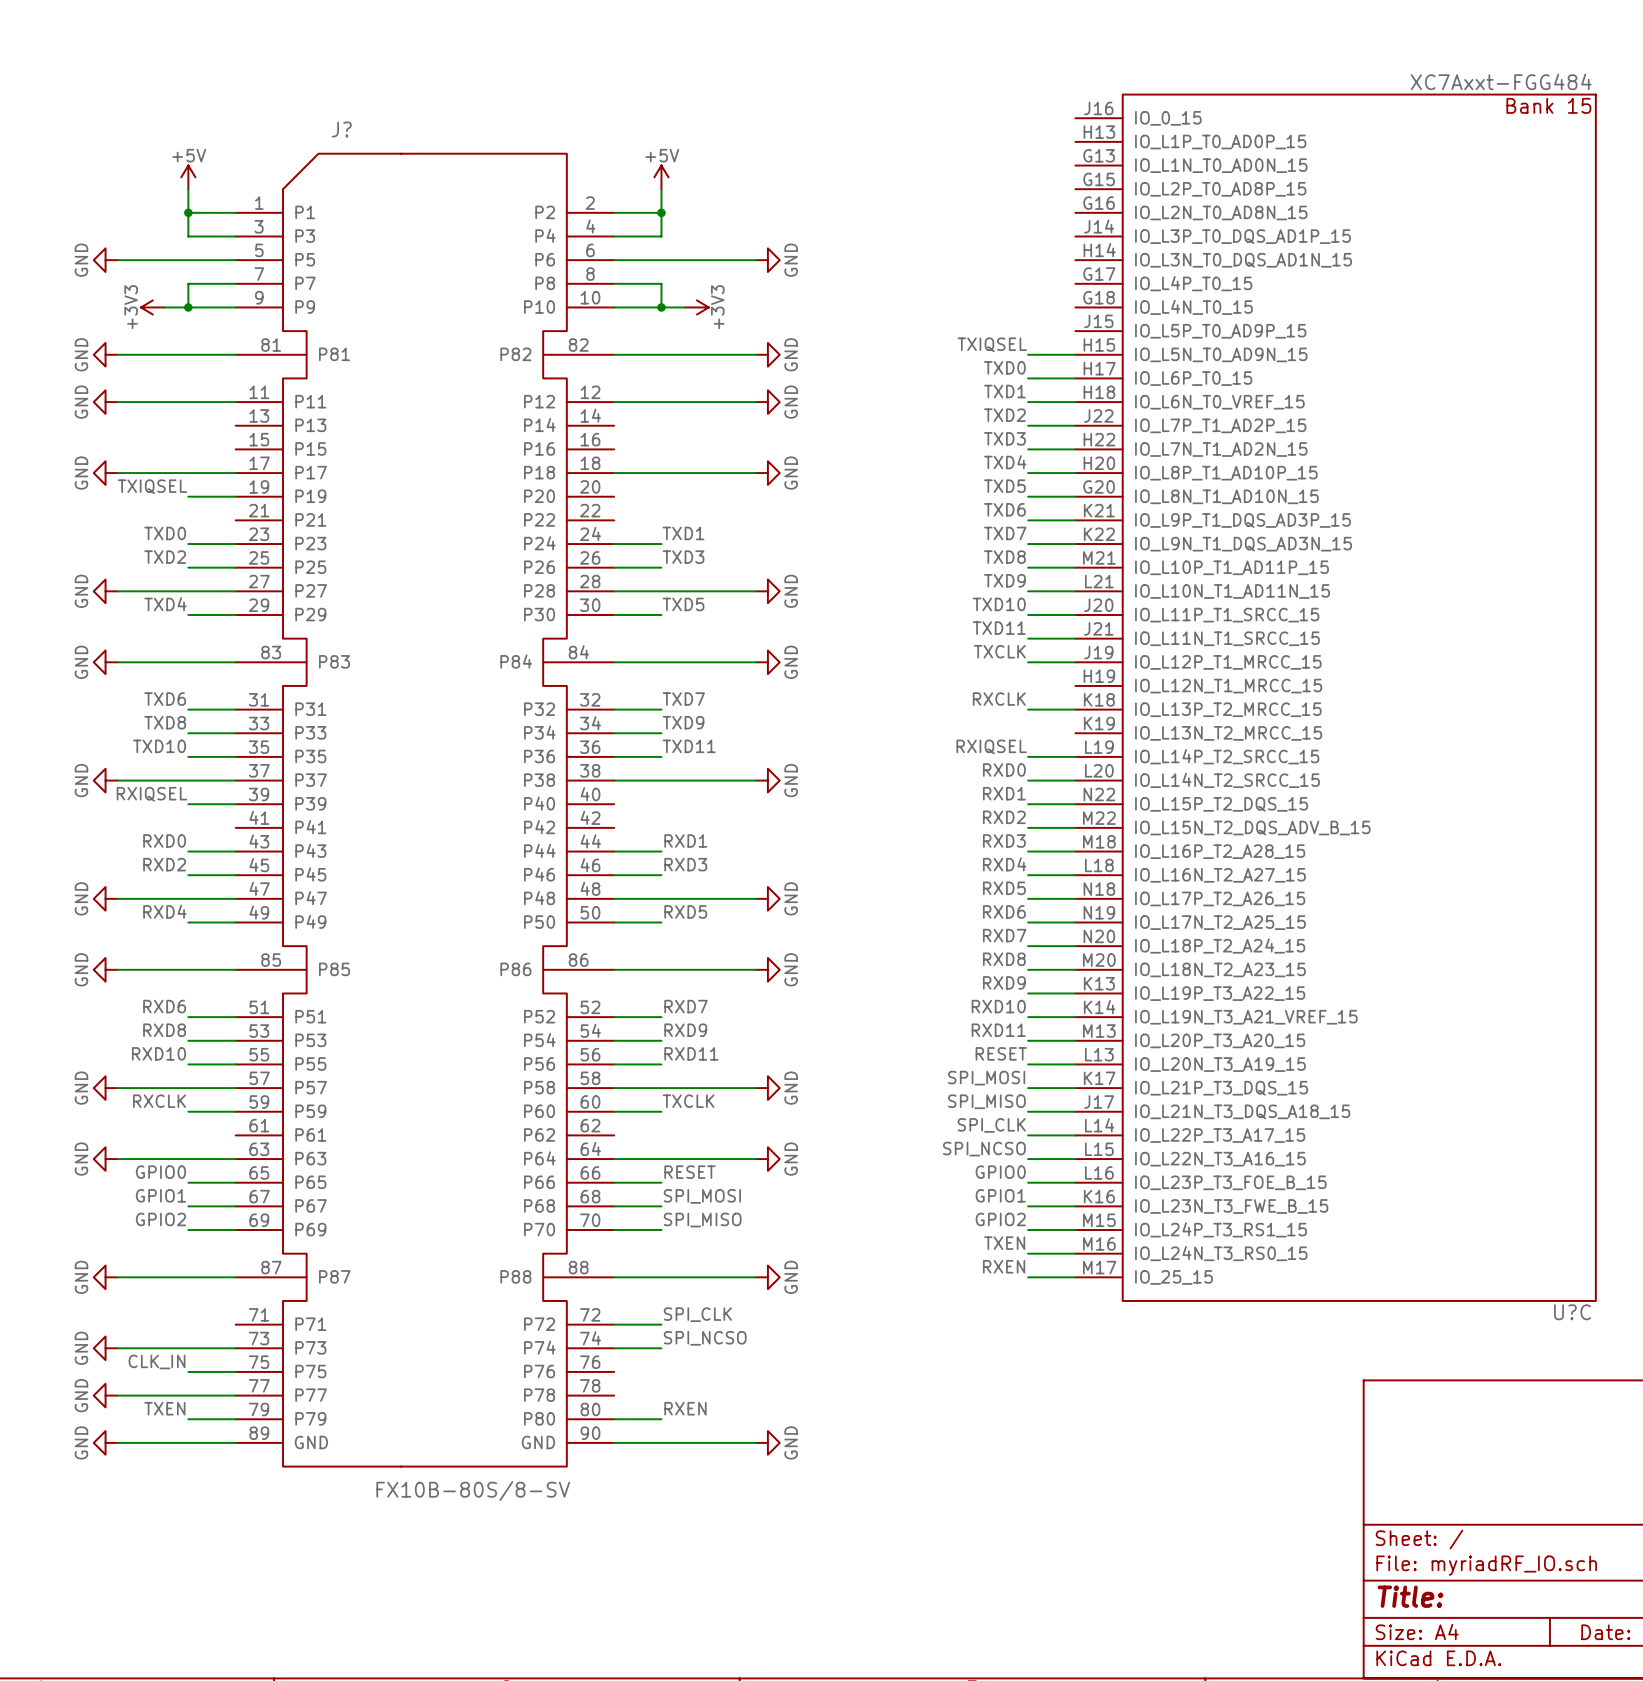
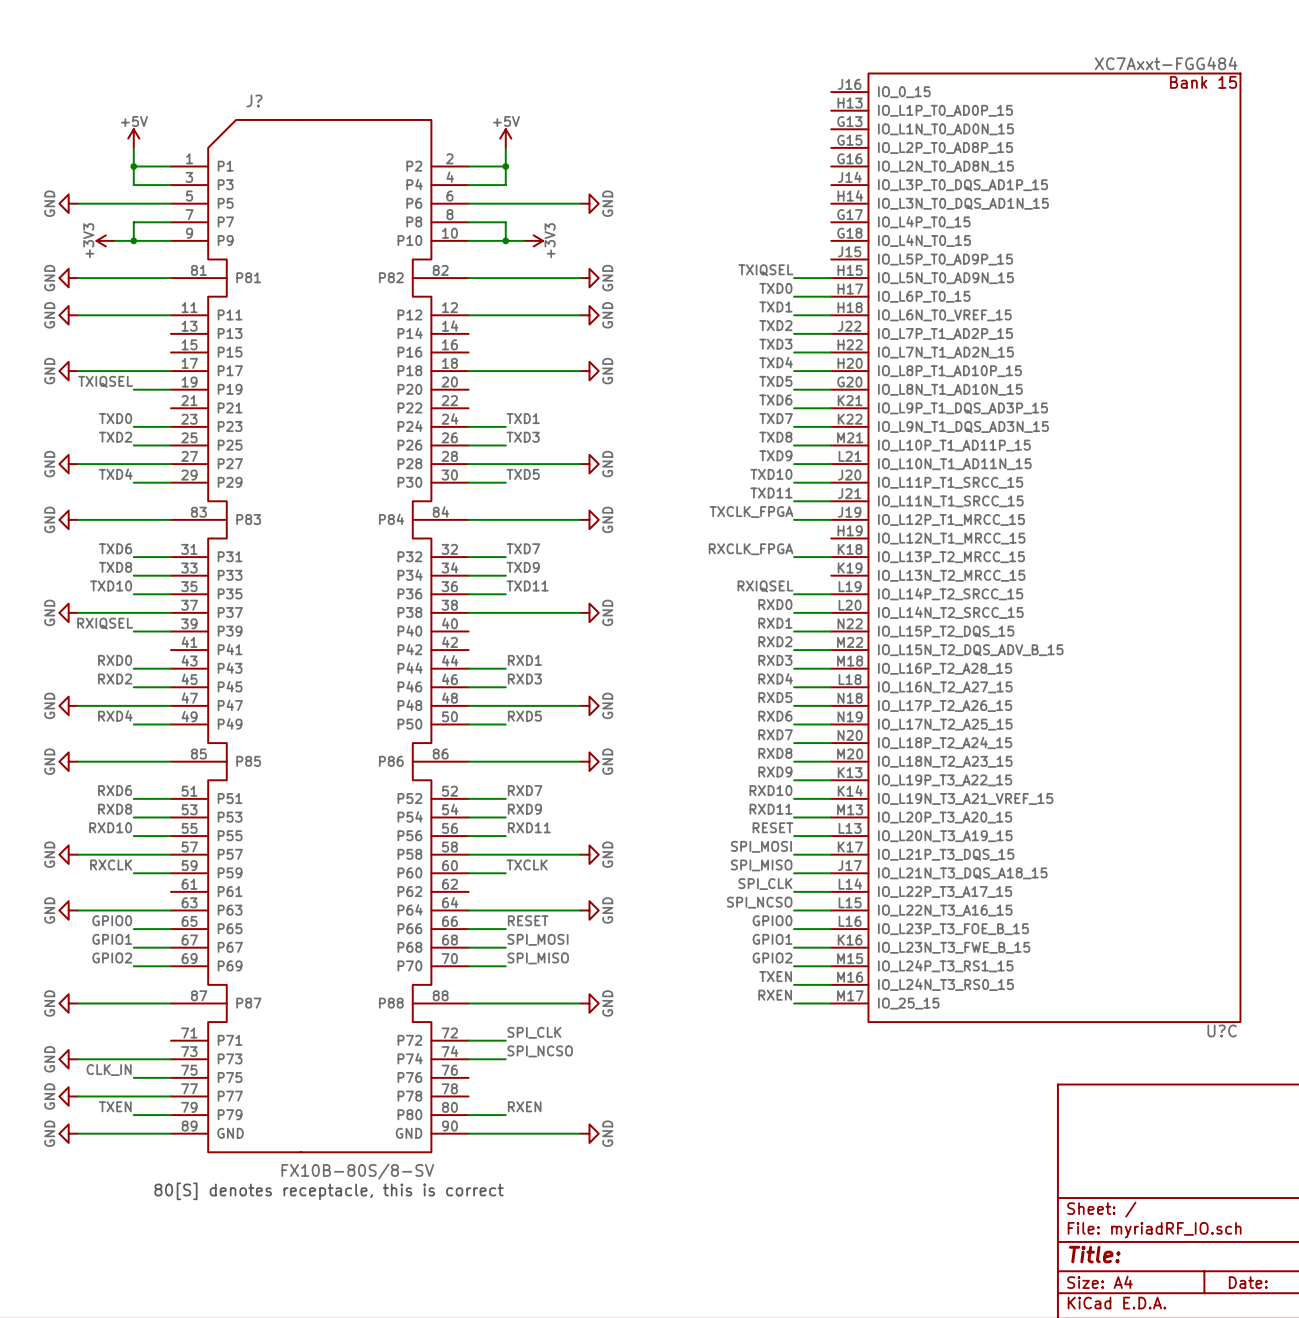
label: TXCLK (999, 651) -> TXCLK_FPGA (751, 512)
label: RXCLK (999, 699) -> RXCLK_FPGA (751, 549)
text: none -> 80[S] denotes receptacle, this is correct (329, 1191)

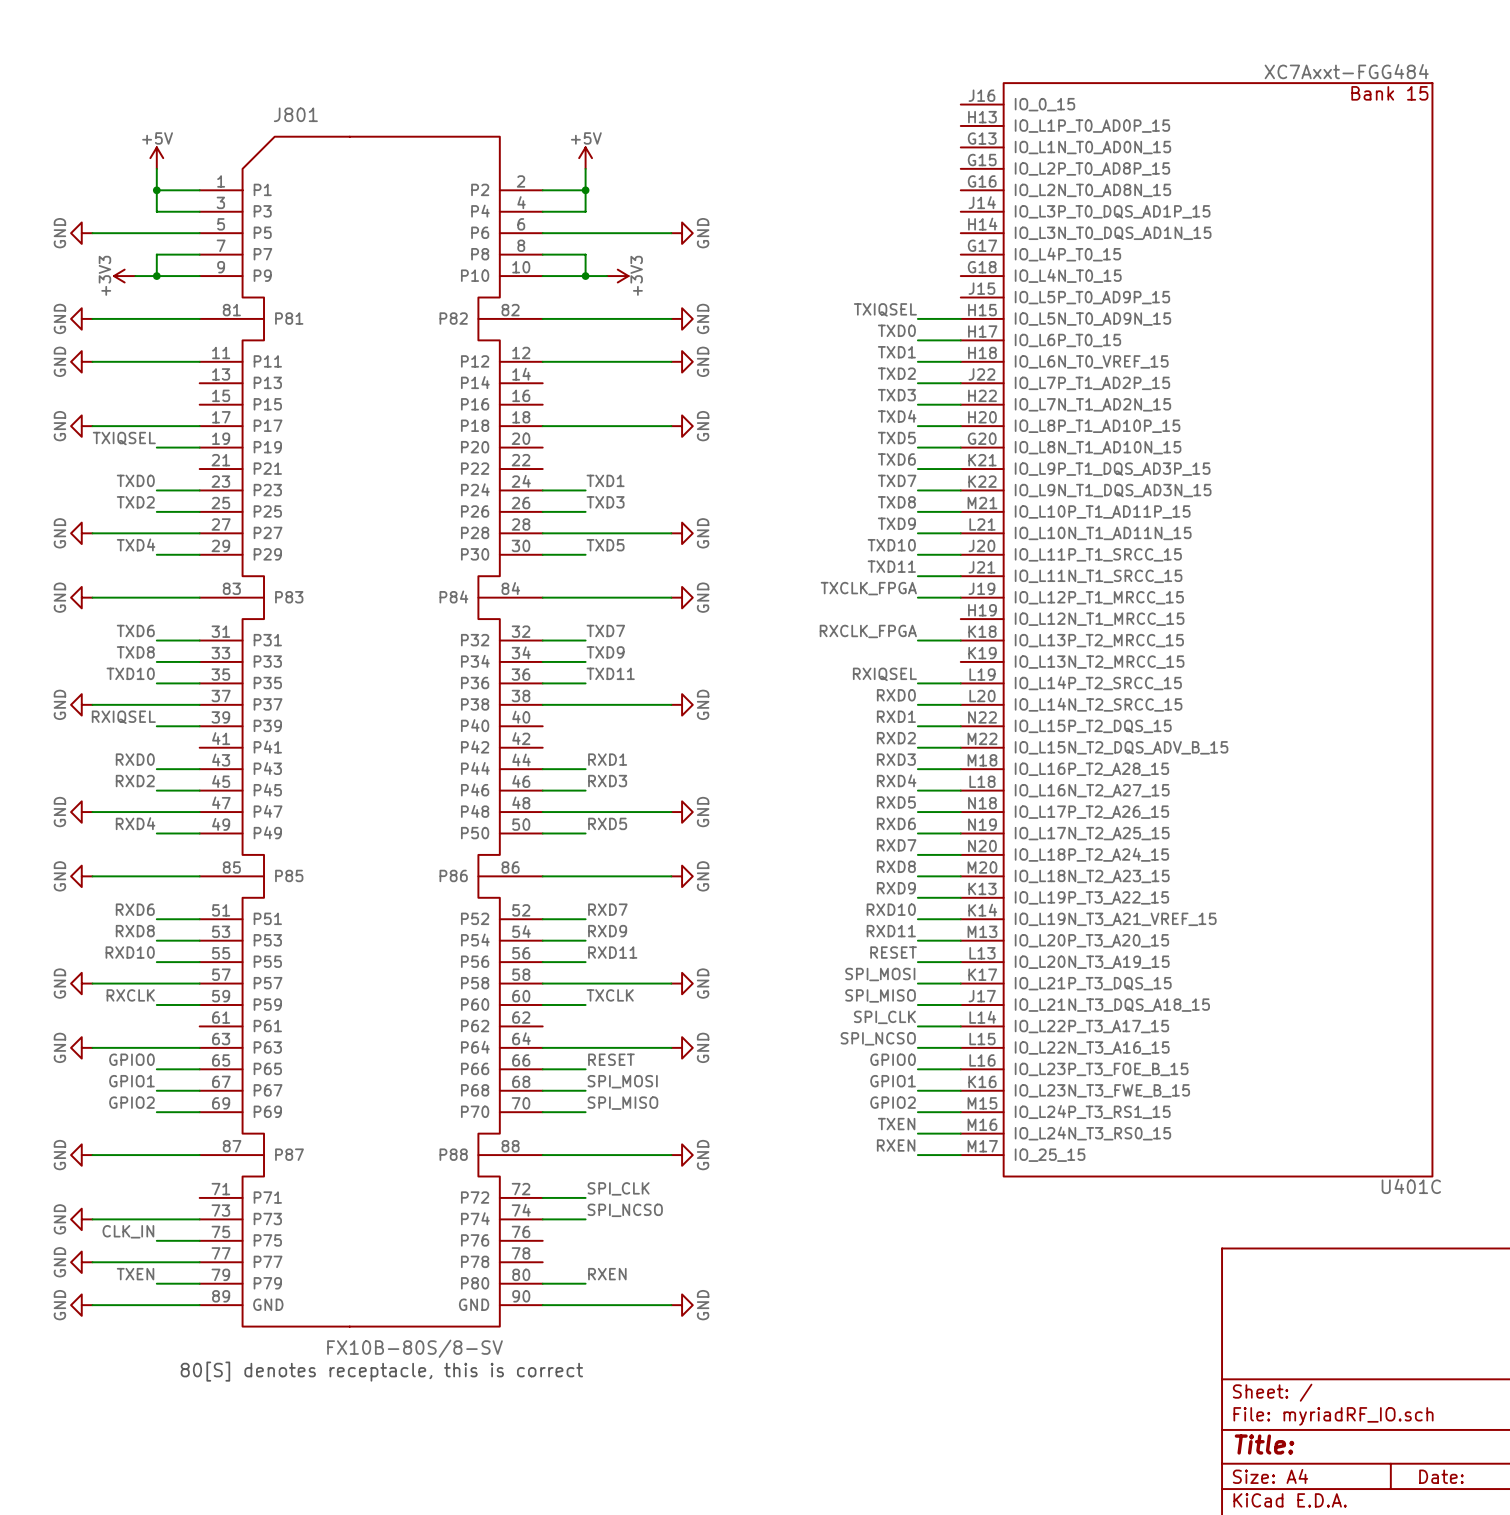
J? name: J? (254, 100) -> J801 (295, 114)
U?C name: U?C (1222, 1030) -> U401C (1411, 1186)

